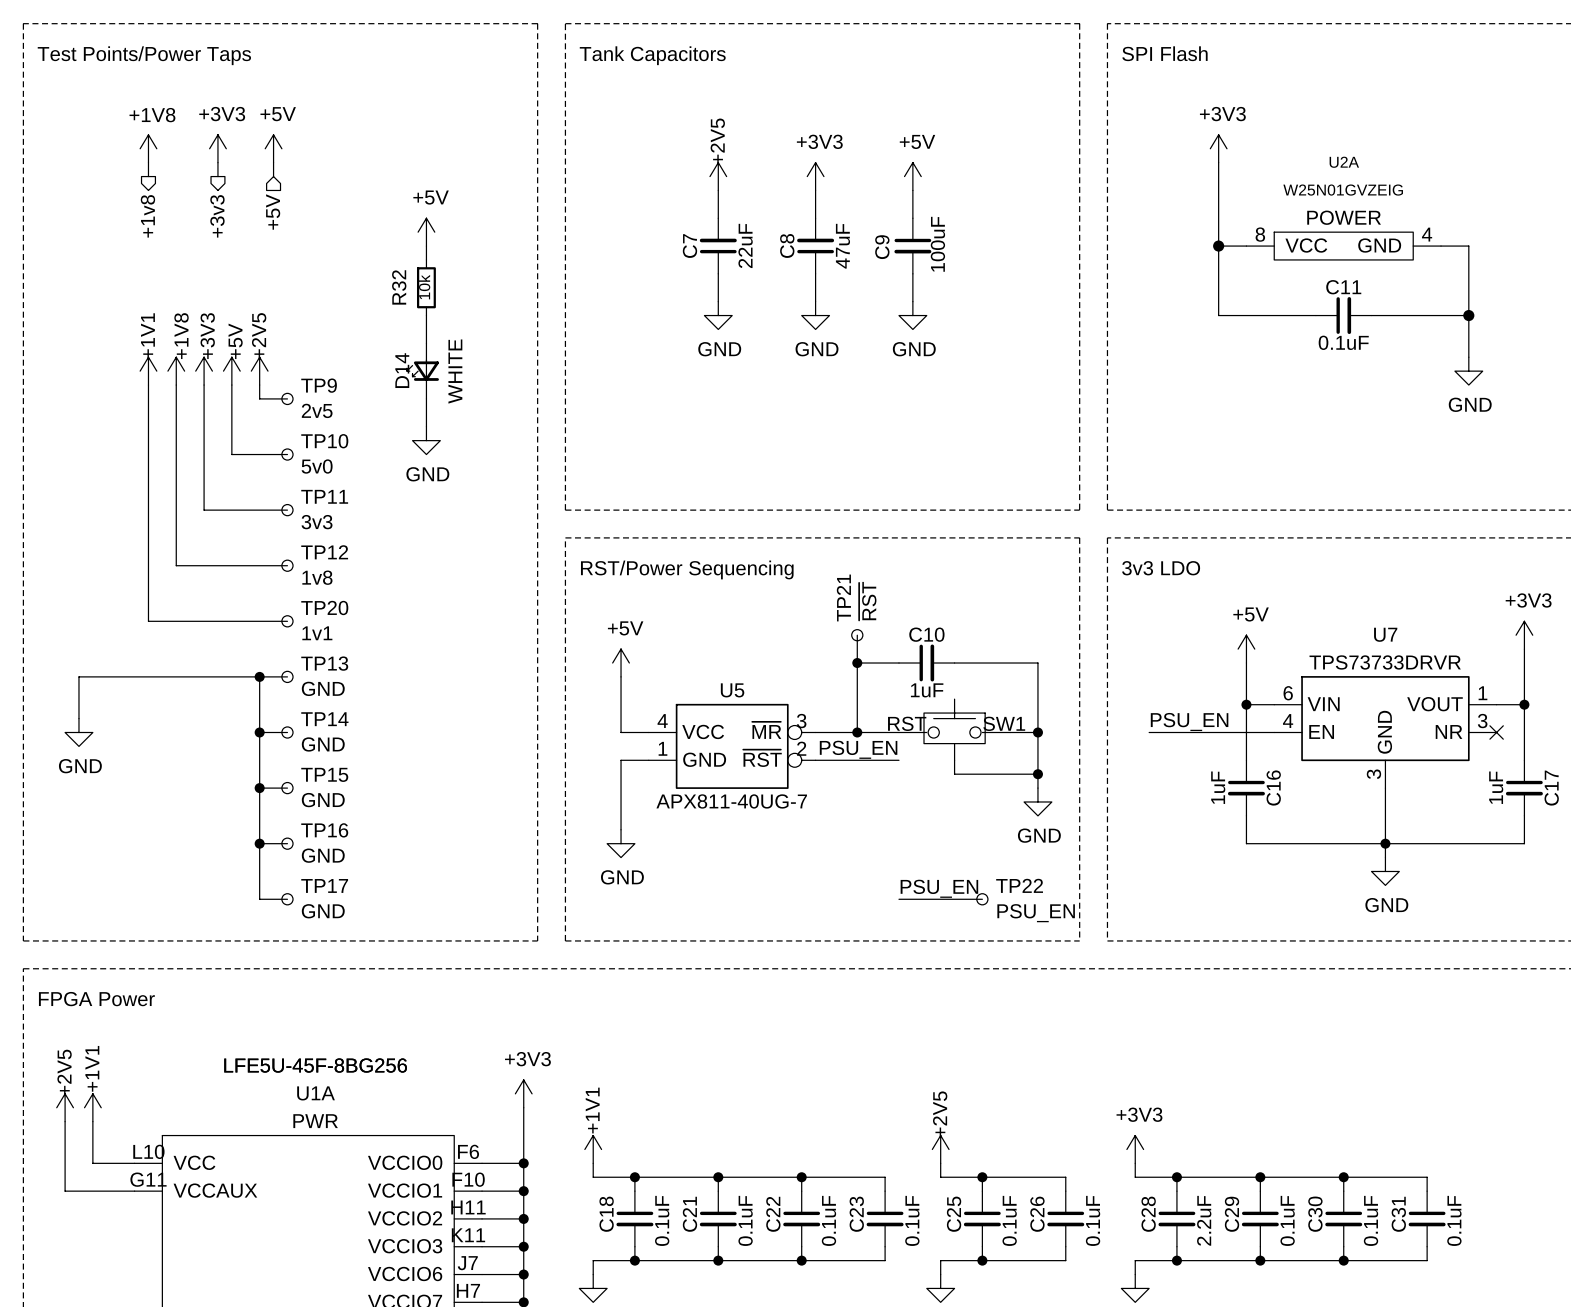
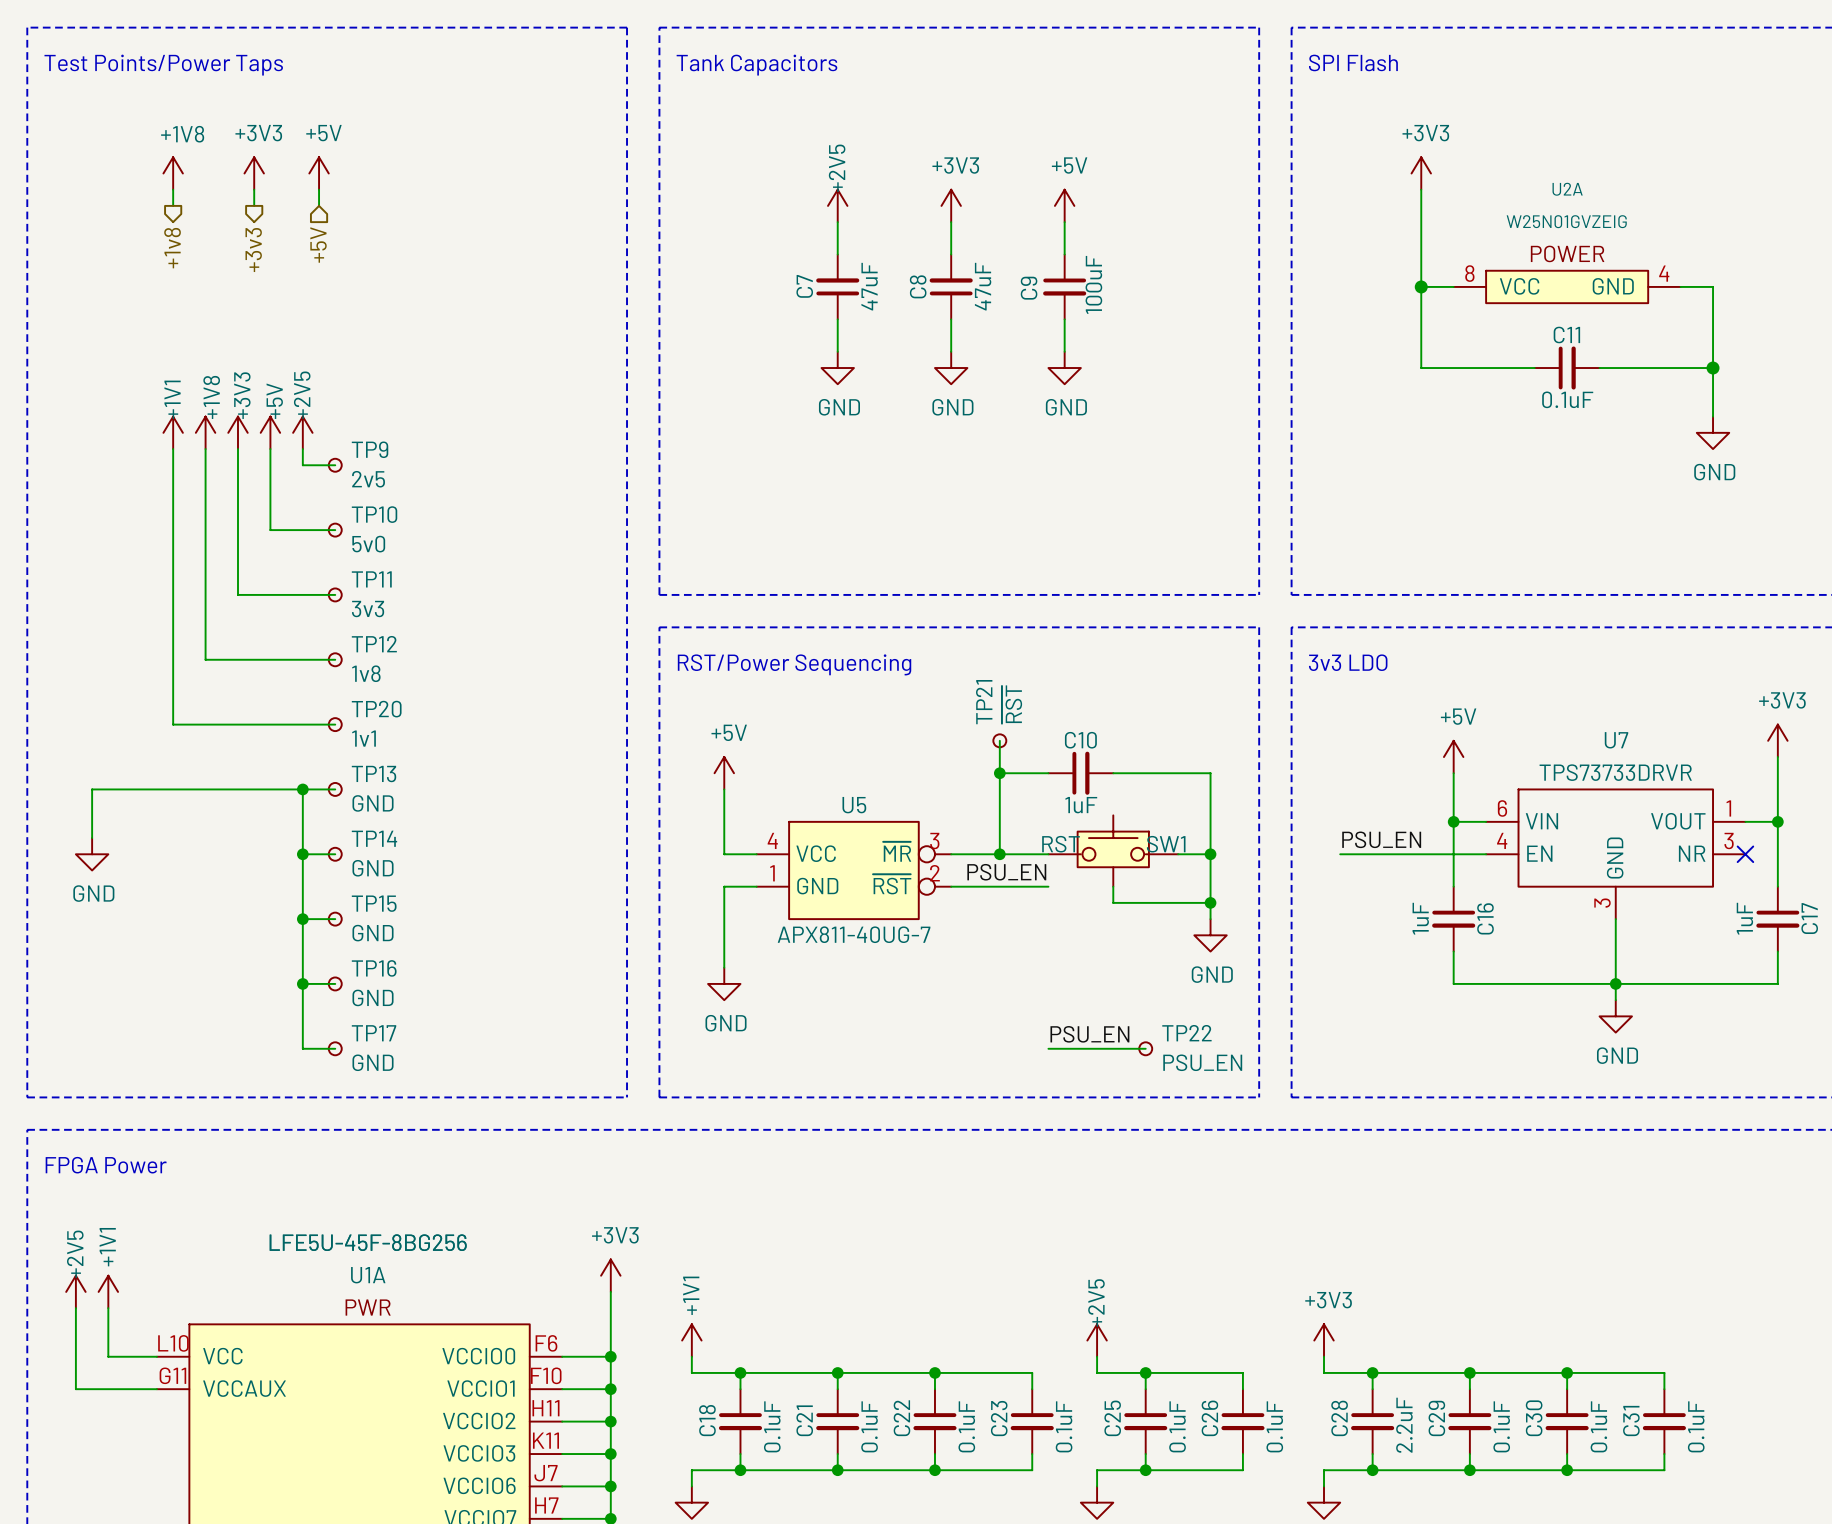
power symbol: +5V (426, 232) -> none
C7 value: 22uF (745, 245) -> 47uF (869, 286)
wire: (426, 246) (426, 259) -> none
R32: 10k (426, 287) -> none
wire: (426, 315) (426, 343) -> none
D14: WHITE (422, 371) -> none
wire: (426, 398) (426, 426) -> none
power symbol: GND (426, 440) -> none

